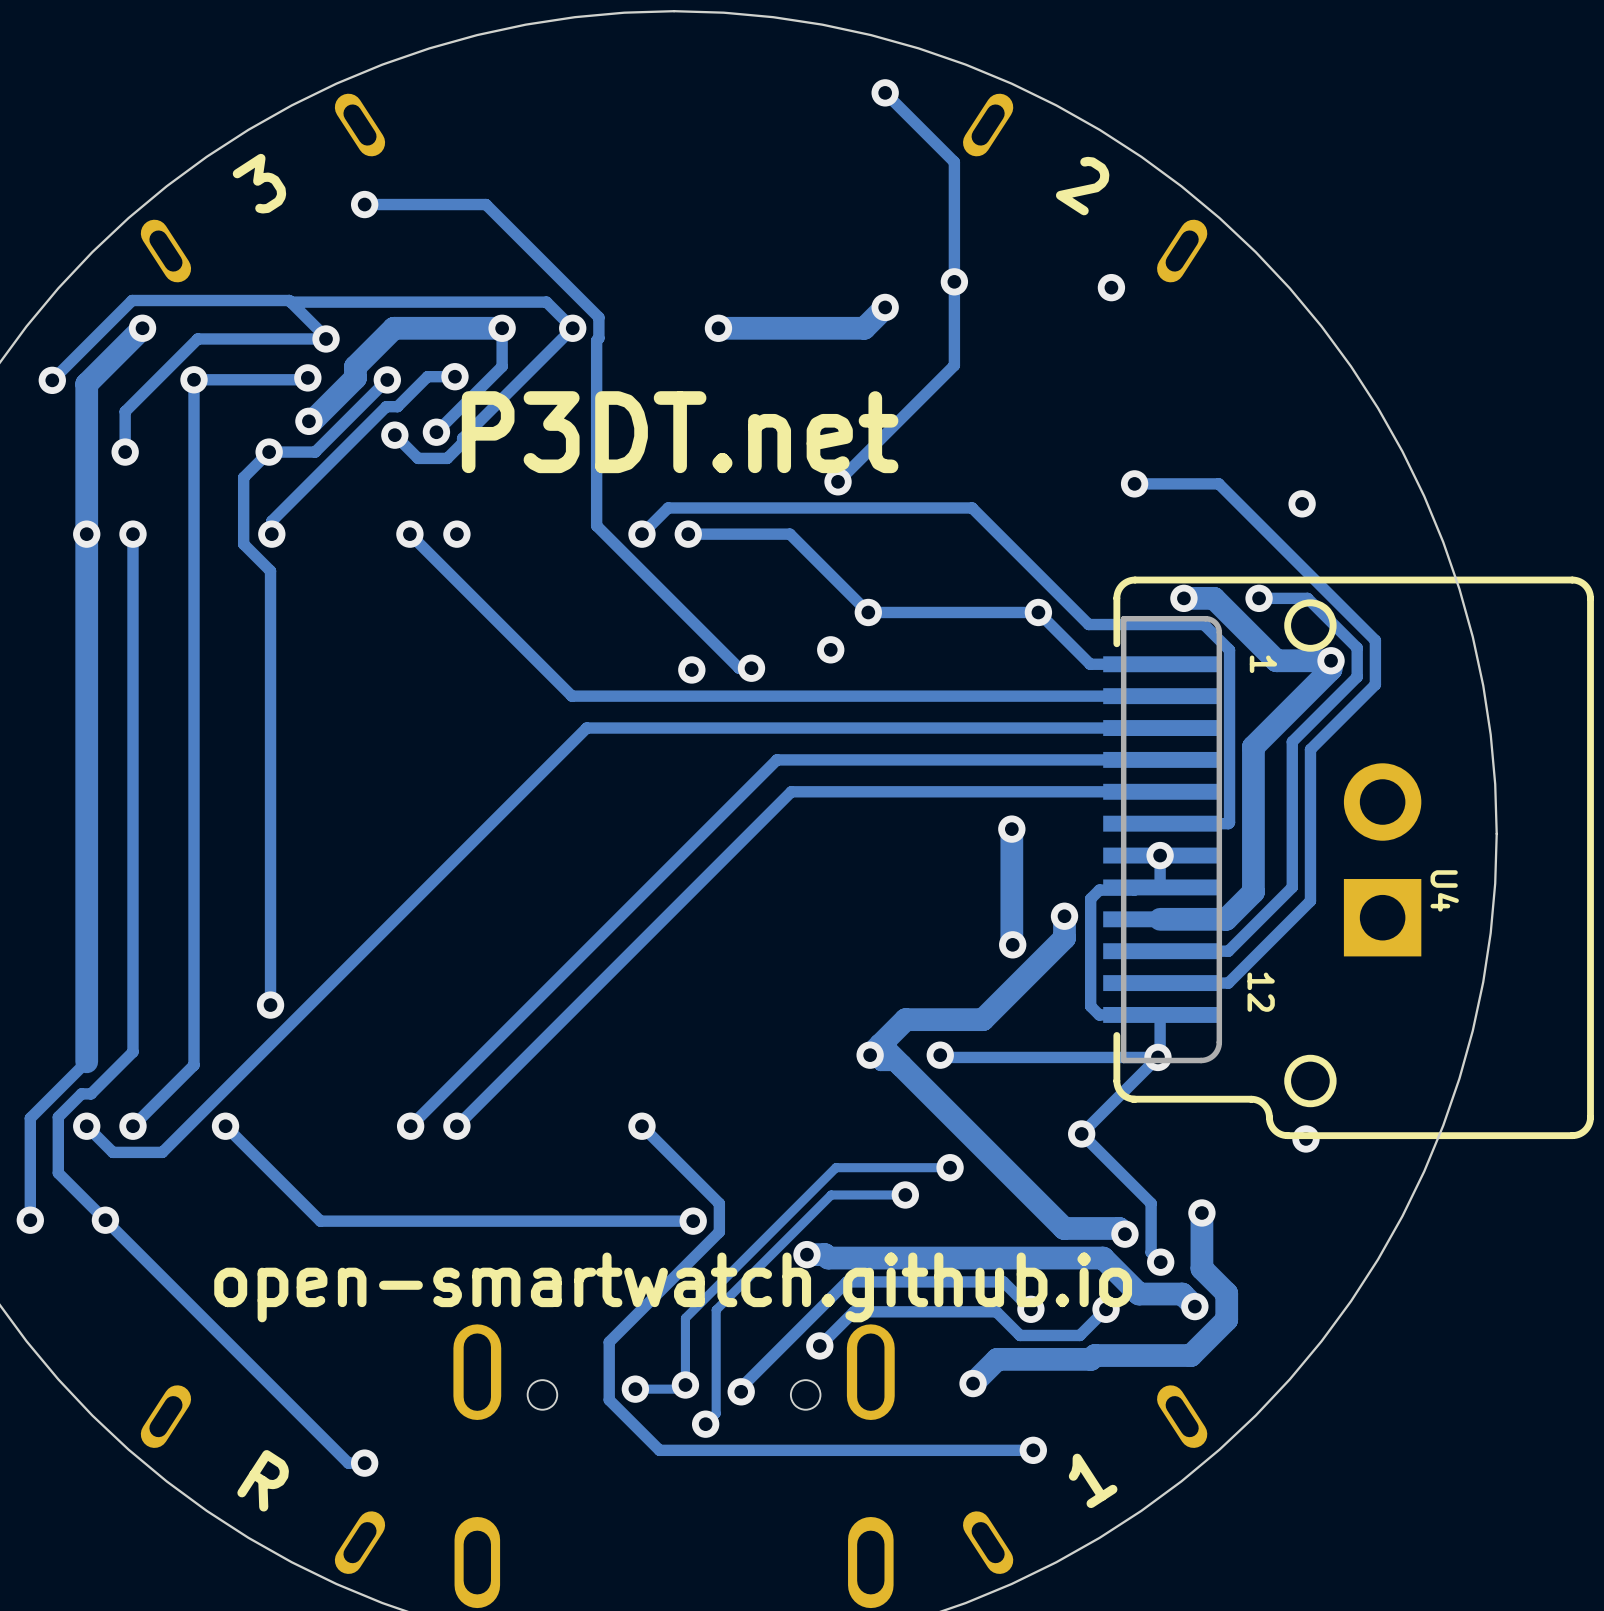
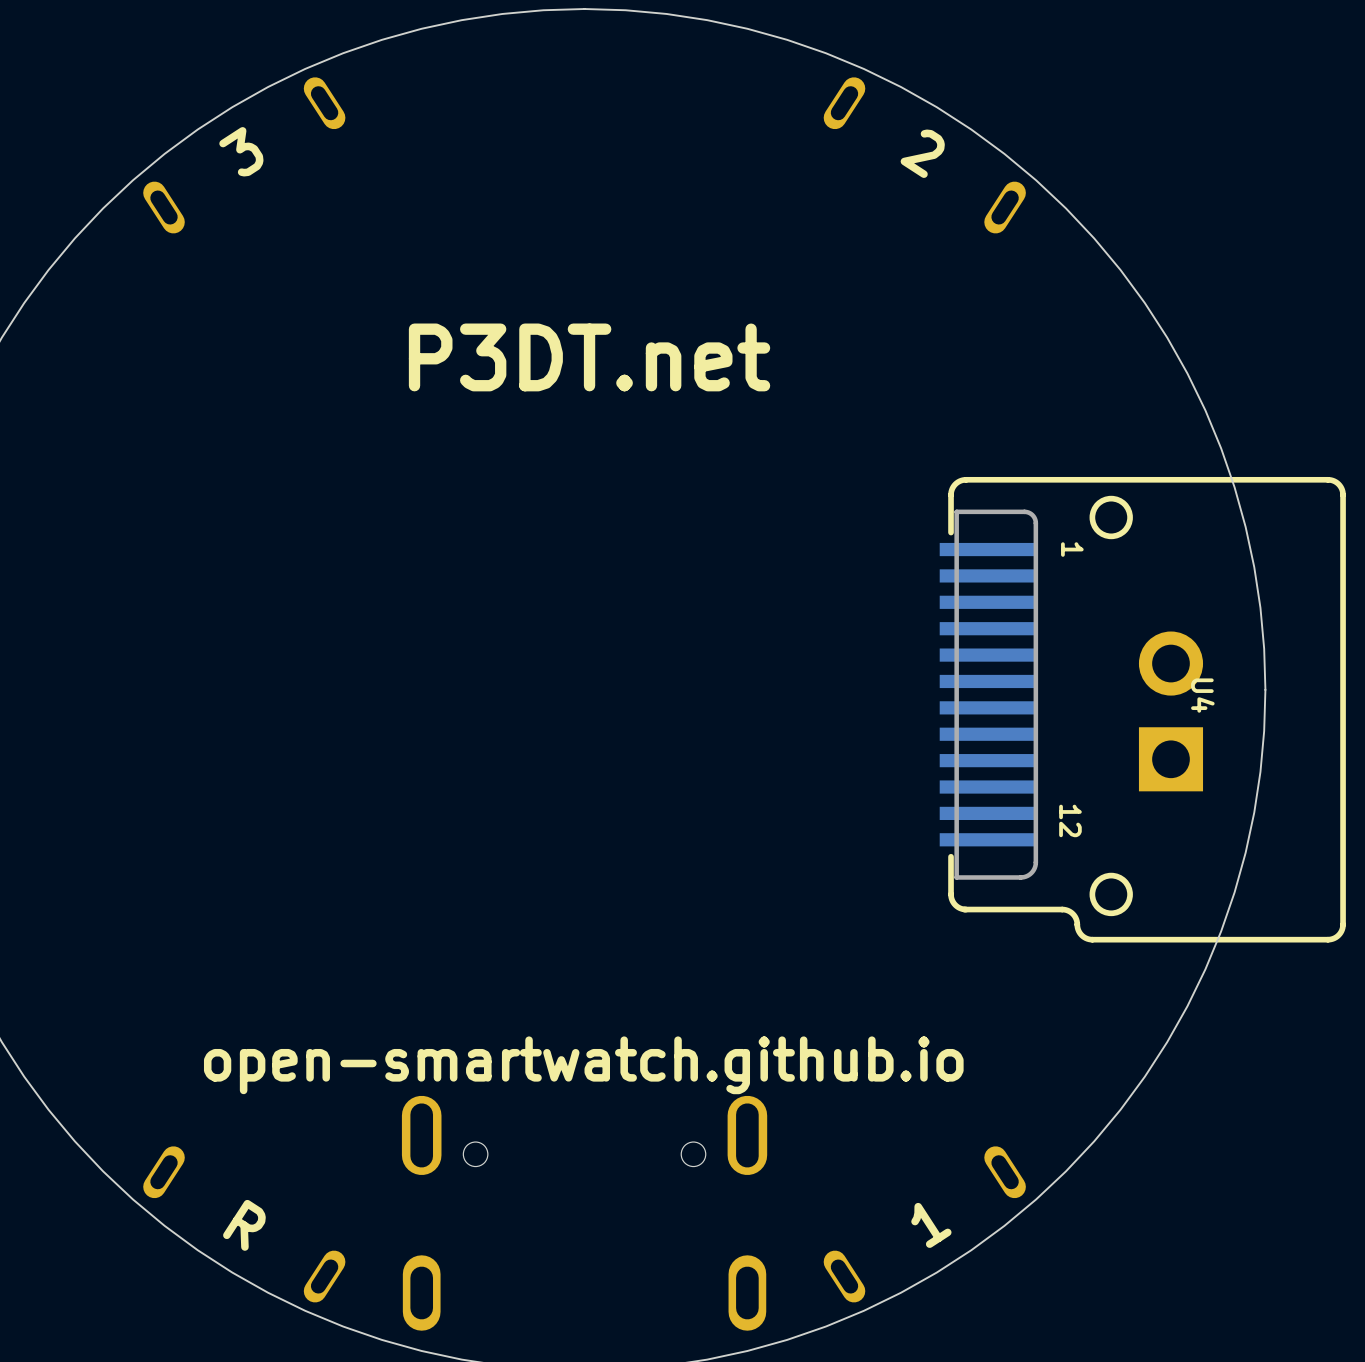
track: (885, 92) (954, 162) (954, 365) (838, 481) -> none
via: (885, 92) -> none
track: (364, 204) (485, 204) (598, 317) (598, 338) (596, 340) (596, 525) (739, 668) (751, 668) -> none
via: (364, 204) -> none
via: (954, 281) -> none
via: (1111, 287) -> none
track: (290, 302) (546, 302) (572, 328) (462, 438) (462, 443) (447, 458) (418, 458) (394, 435) -> none
track: (885, 307) (864, 328) (718, 328) -> none
via: (885, 307) -> none
track: (142, 328) (86, 384) (86, 1061) (30, 1118) (30, 1220) -> none
via: (142, 328) -> none
via: (502, 328) -> none
via: (572, 328) -> none
via: (718, 328) -> none
via: (326, 338) -> none
track: (454, 376) (427, 376) (397, 406) (386, 406) (271, 521) (271, 534) -> none
via: (454, 376) -> none
track: (307, 377) (305, 379) (194, 379) (194, 1065) (132, 1126) -> none
via: (307, 377) -> none
via: (194, 379) -> none
track: (387, 379) (315, 452) (269, 452) (243, 477) (243, 544) (270, 571) (270, 1005) -> none
via: (387, 379) -> none
track: (52, 380) (132, 300) (289, 300) (326, 337) (326, 338) (197, 338) (125, 411) (125, 452) -> none
via: (52, 380) -> none
track: (308, 421) (312, 421) (355, 378) (355, 366) (393, 328) (502, 328) (502, 366) (436, 432) -> none
via: (308, 421) -> none
via: (436, 432) -> none
via: (394, 435) -> none
via: (125, 452) -> none
via: (269, 452) -> none
via: (838, 481) -> none
track: (1134, 483) (1218, 483) (1375, 640) (1375, 684) (1310, 749) (1310, 901) (1228, 983) (1160, 983) -> none
via: (1134, 483) -> none
via: (1302, 503) -> none
via: (86, 534) -> none
track: (132, 534) (132, 1051) (91, 1093) (81, 1093) (58, 1117) (58, 1173) (348, 1463) (364, 1463) -> none
via: (132, 534) -> none
via: (271, 534) -> none
track: (409, 534) (571, 696) (1160, 696) -> none
via: (409, 534) -> none
via: (456, 534) -> none
track: (642, 534) (668, 507) (972, 507) (1088, 624) (1203, 624) (1229, 650) (1229, 822) (1160, 823) -> none
via: (642, 534) -> none
track: (688, 534) (789, 534) (868, 612) (1038, 612) (1090, 664) (1160, 664) -> none
via: (688, 534) -> none
track: (1183, 598) (1214, 598) (1276, 660) (1331, 660) (1331, 669) (1253, 746) (1253, 892) (1226, 919) (1160, 919) -> none
via: (1183, 598) -> none
track: (1259, 598) (1307, 598) (1357, 647) (1357, 676) (1292, 741) (1292, 887) (1228, 951) (1160, 951) -> none
via: (1259, 598) -> none
via: (868, 612) -> none
via: (1038, 612) -> none
via: (830, 649) -> none
via: (1331, 660) -> none
via: (751, 668) -> none
via: (691, 669) -> none
track: (1160, 728) (586, 728) (162, 1152) (112, 1152) (86, 1126) -> none
track: (1160, 759) (776, 759) (410, 1126) -> none
track: (1160, 791) (791, 791) (456, 1126) -> none
track: (1011, 829) (1012, 944) -> none
via: (1011, 829) -> none
track: (1160, 855) (1160, 887) (1137, 887) (1134, 890) (1099, 890) (1090, 898) (1090, 1006) (1099, 1014) (1160, 1014) (1160, 1055) (1081, 1133) (1151, 1203) (1151, 1252) (1160, 1262) -> none
via: (1160, 855) -> none
U4 name position: U4 (1444, 890) -> U4 (1202, 695)
track: (1064, 916) (1064, 938) (982, 1019) (905, 1019) (870, 1055) (880, 1065) (901, 1065) -> none
via: (1064, 916) -> none
via: (1012, 944) -> none
via: (270, 1005) -> none
track: (880, 1044) (1064, 1228) (1119, 1228) (1124, 1234) -> none
via: (870, 1055) -> none
track: (940, 1055) (942, 1057) (1157, 1057) -> none
via: (940, 1055) -> none
via: (1157, 1057) -> none
via: (86, 1126) -> none
via: (132, 1126) -> none
track: (225, 1126) (320, 1221) (693, 1221) -> none
via: (225, 1126) -> none
via: (410, 1126) -> none
via: (456, 1126) -> none
track: (642, 1126) (719, 1203) (719, 1232) (609, 1342) (609, 1399) (659, 1450) (1033, 1450) -> none
via: (642, 1126) -> none
via: (1081, 1133) -> none
via: (1305, 1138) -> none
track: (950, 1167) (835, 1167) (685, 1318) (685, 1385) (681, 1389) (635, 1389) -> none
via: (950, 1167) -> none
track: (905, 1194) (831, 1194) (716, 1310) (716, 1413) (705, 1424) -> none
via: (905, 1194) -> none
track: (1201, 1212) (1201, 1268) (1226, 1293) (1226, 1319) (1190, 1355) (1094, 1355) (1091, 1359) (997, 1359) (973, 1383) -> none
via: (1201, 1212) -> none
via: (30, 1220) -> none
via: (105, 1220) -> none
via: (693, 1221) -> none
via: (1124, 1234) -> none
track: (806, 1254) (824, 1254) (828, 1258) (1103, 1258) (1139, 1294) (1182, 1294) (1194, 1306) -> none
via: (806, 1254) -> none
via: (1160, 1262) -> none
via: (1194, 1306) -> none
track: (1030, 1309) (1003, 1281) (846, 1281) (741, 1387) (741, 1391) -> none
via: (1030, 1309) -> none
track: (1106, 1309) (1079, 1335) (1020, 1335) (996, 1311) (853, 1311) (819, 1345) -> none
via: (1106, 1309) -> none
via: (819, 1345) -> none
via: (973, 1383) -> none
via: (685, 1385) -> none
via: (635, 1389) -> none
via: (741, 1391) -> none
via: (705, 1424) -> none
via: (1033, 1450) -> none
via: (364, 1463) -> none

